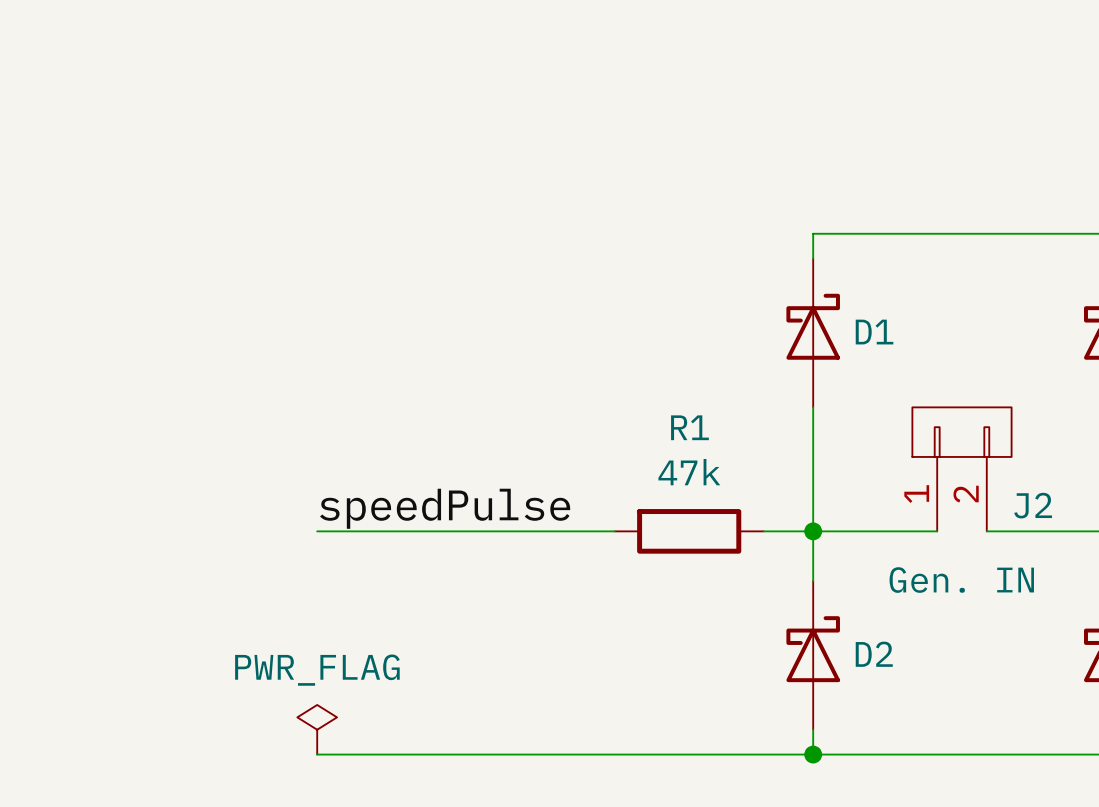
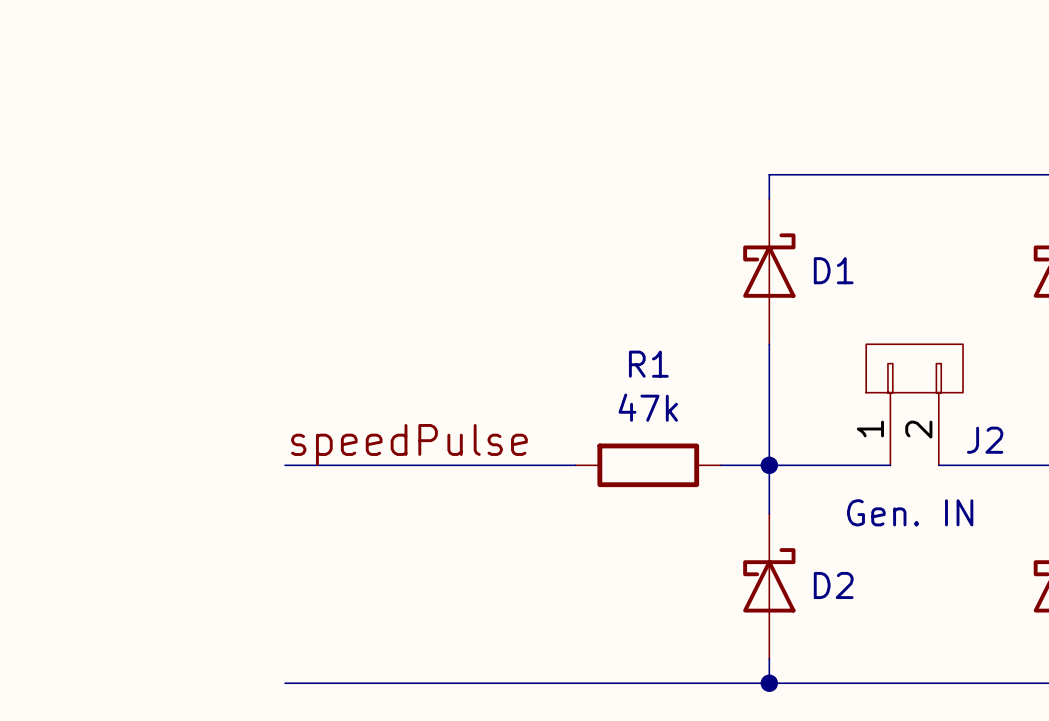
power symbol: PWR_FLAG (317, 729) -> none

